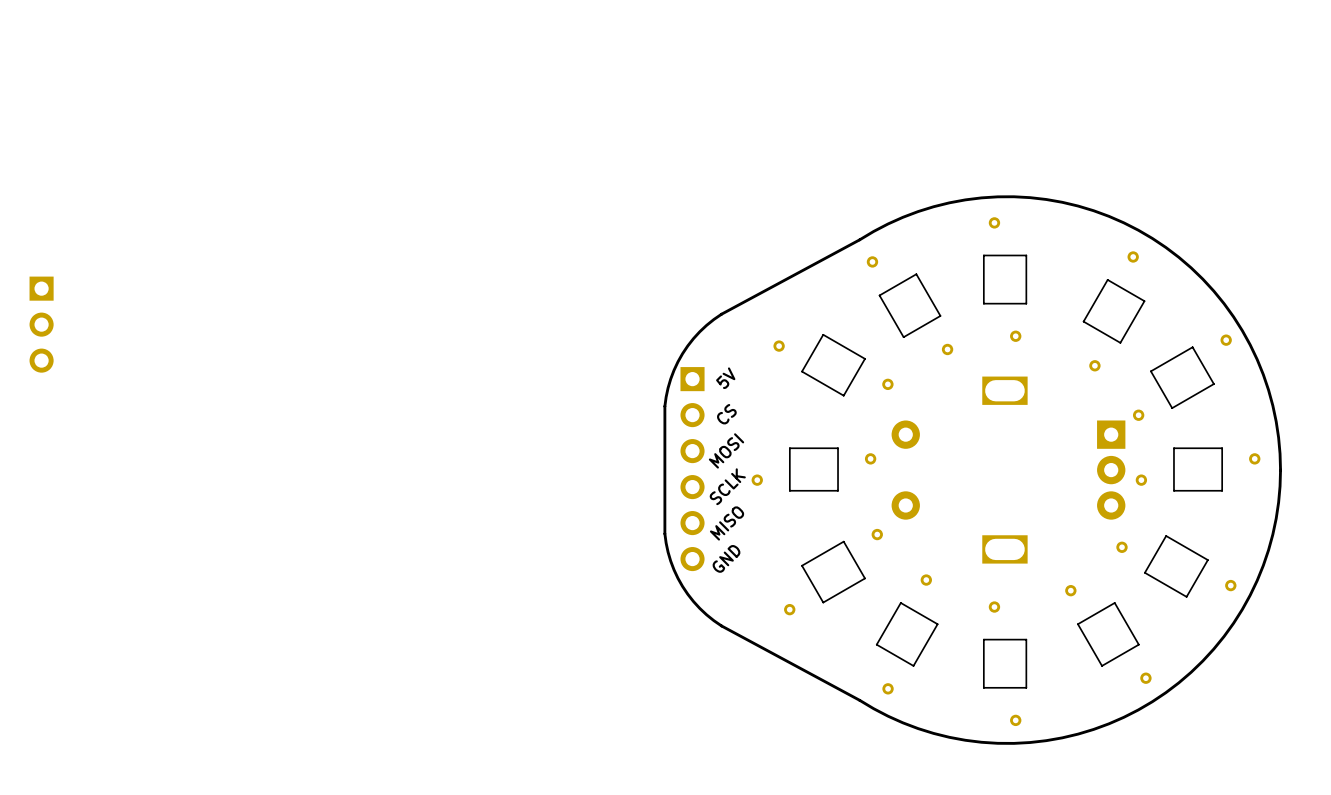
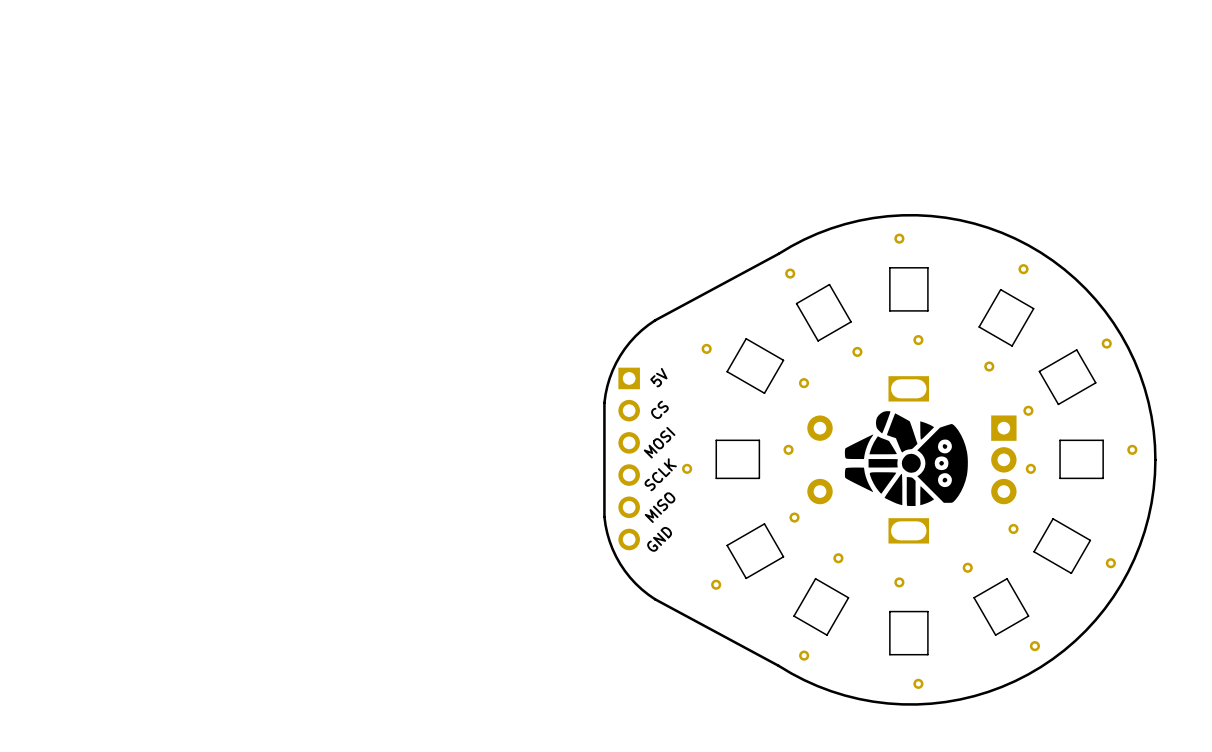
part: (41, 324) -> none
drawing: none -> [844, 411, 968, 507]

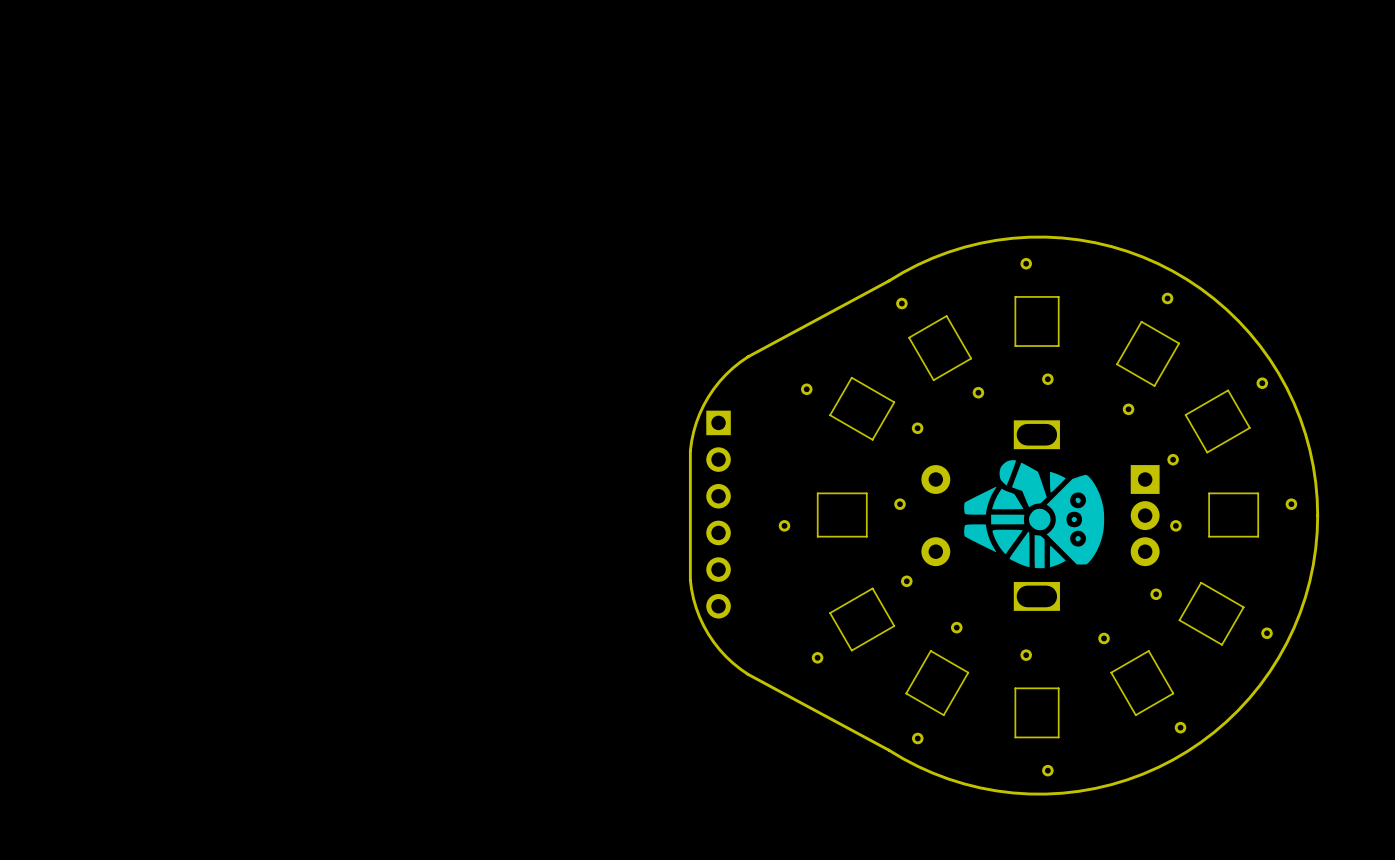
text: 5V (658, 377) -> none
text: CS (659, 409) -> none
text: MOSI (659, 442) -> none
text: SCLK (660, 474) -> none
text: MISO (660, 507) -> none
text: GND (659, 539) -> none

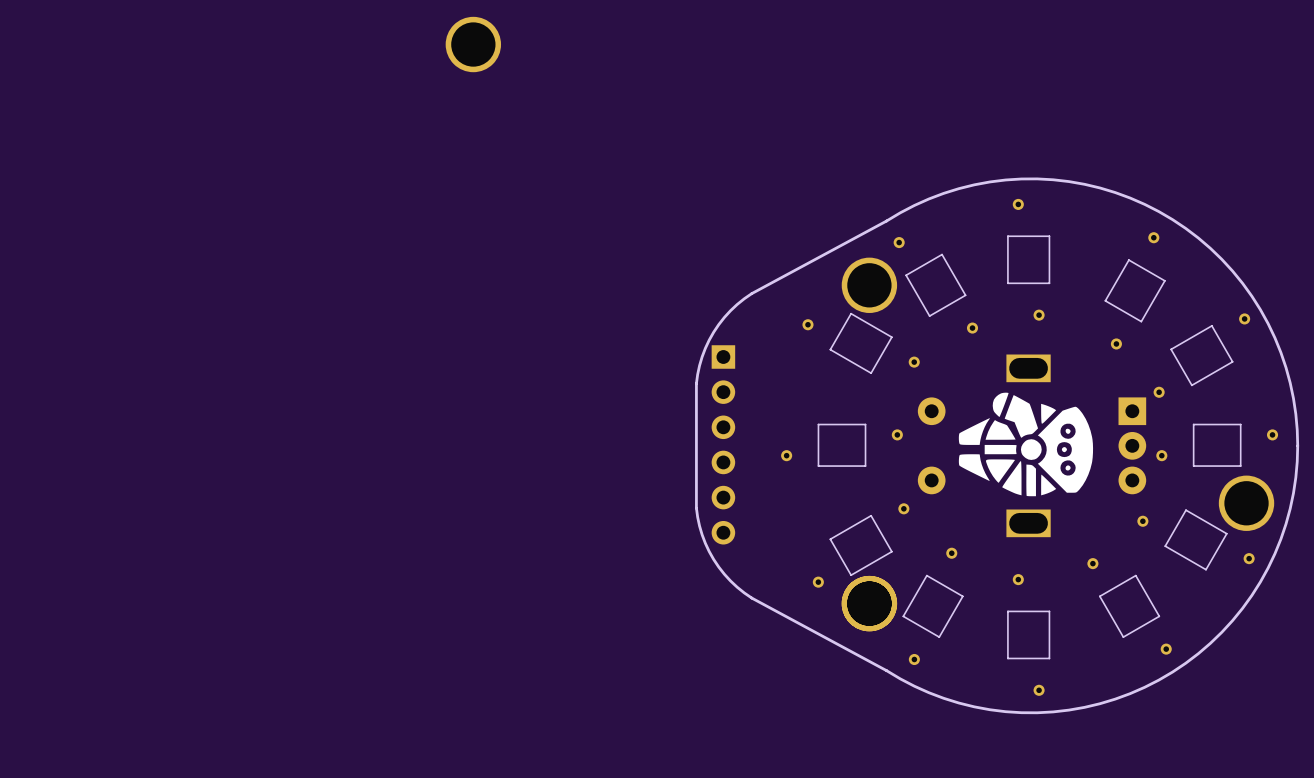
part: none -> (473, 44)
part: none -> (869, 285)
part: none -> (1246, 503)
part: none -> (869, 603)

